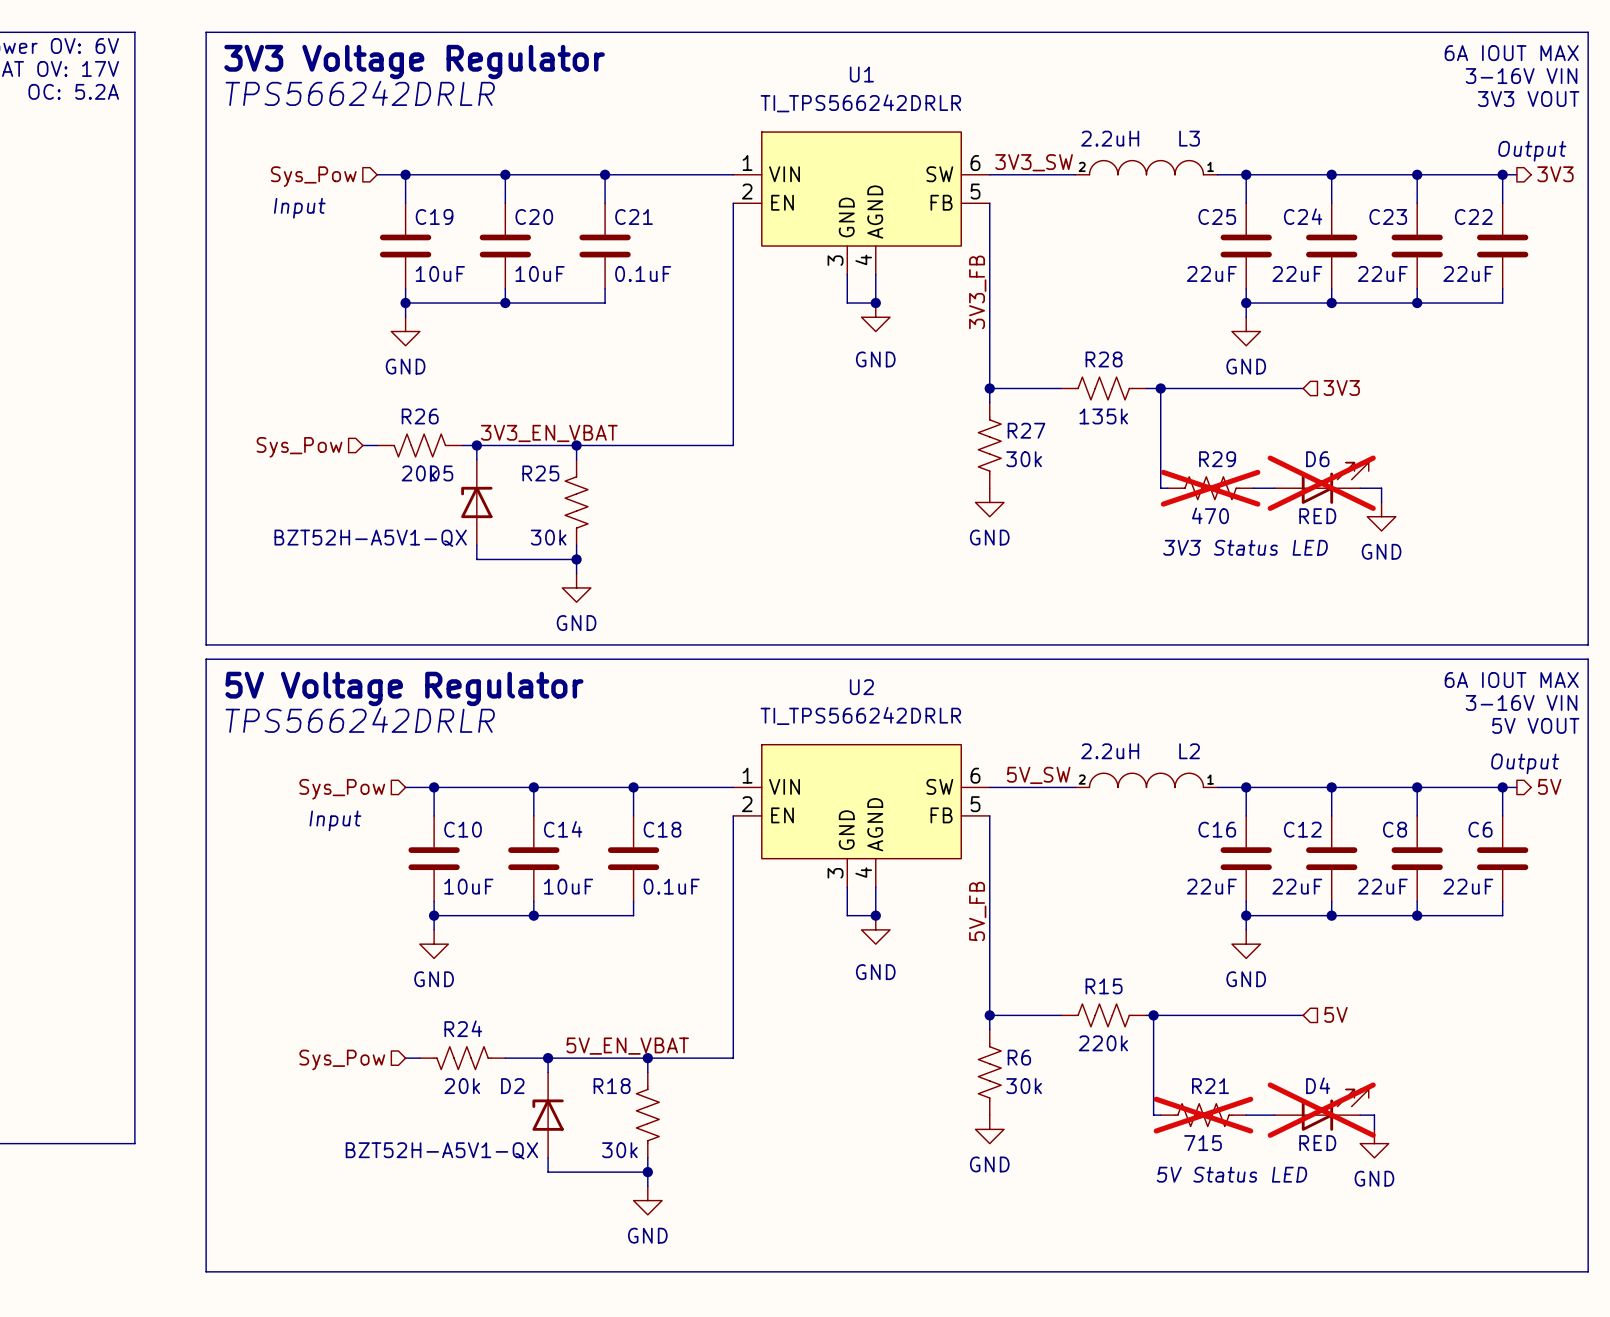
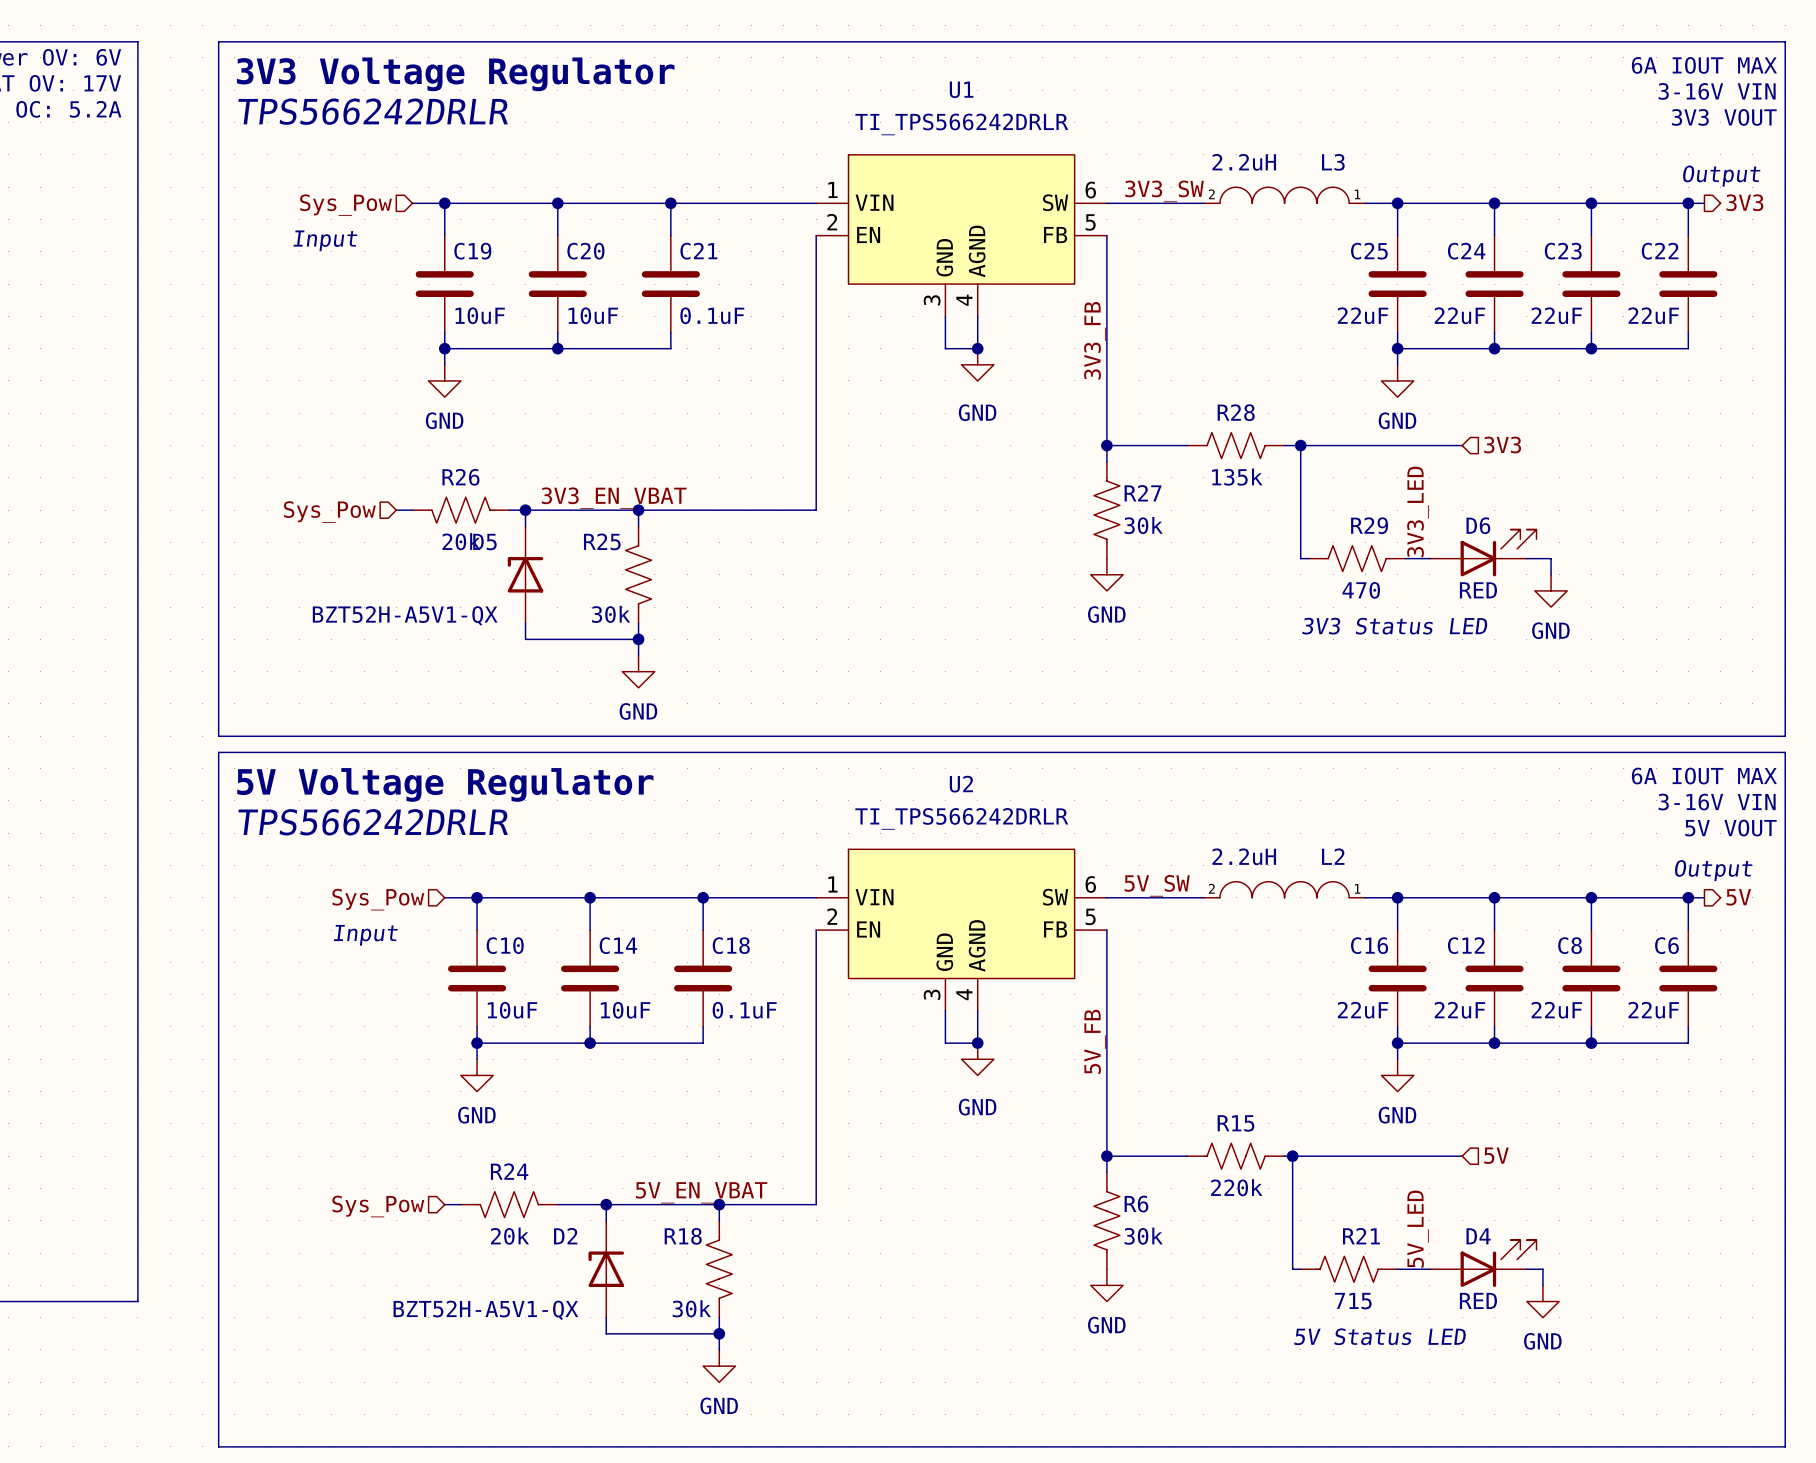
label: none -> 3V3_LED (1417, 511)
D6 do-not-place cross: (1321, 483) -> none
R29 do-not-place cross: (1210, 488) -> none
label: none -> 5V_LED (1418, 1229)
D4 do-not-place cross: (1321, 1110) -> none
R21 do-not-place cross: (1203, 1115) -> none

